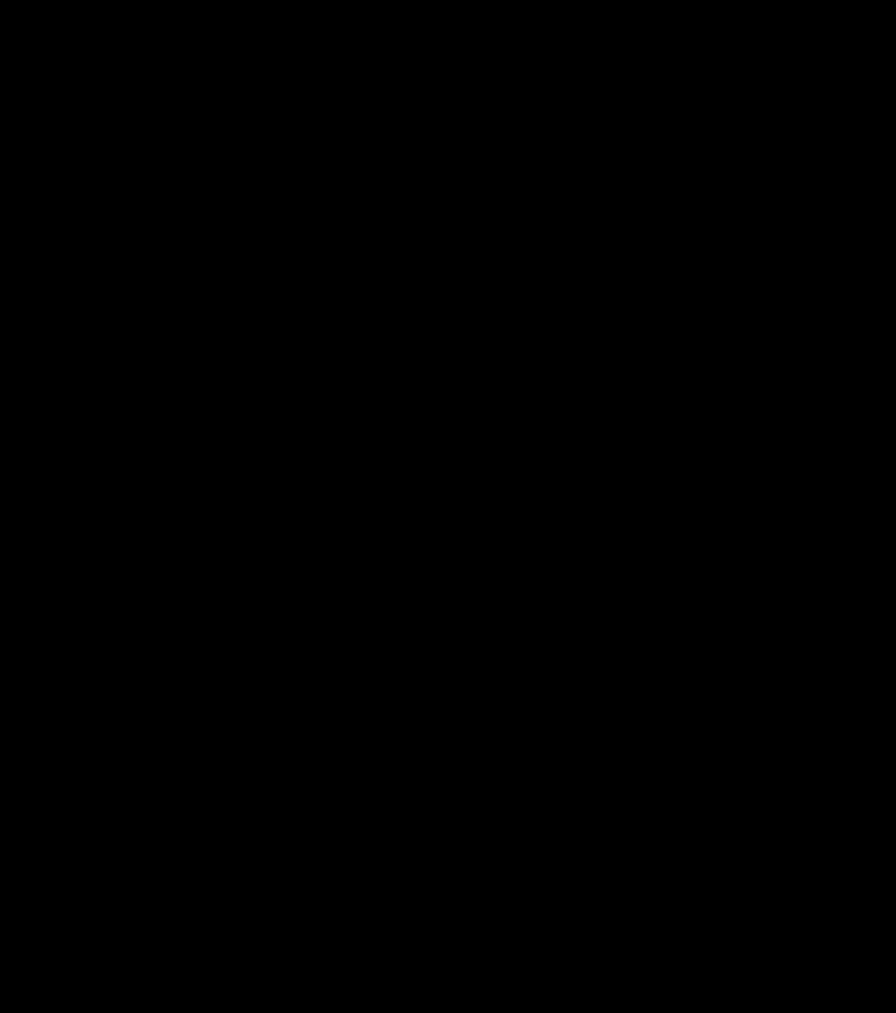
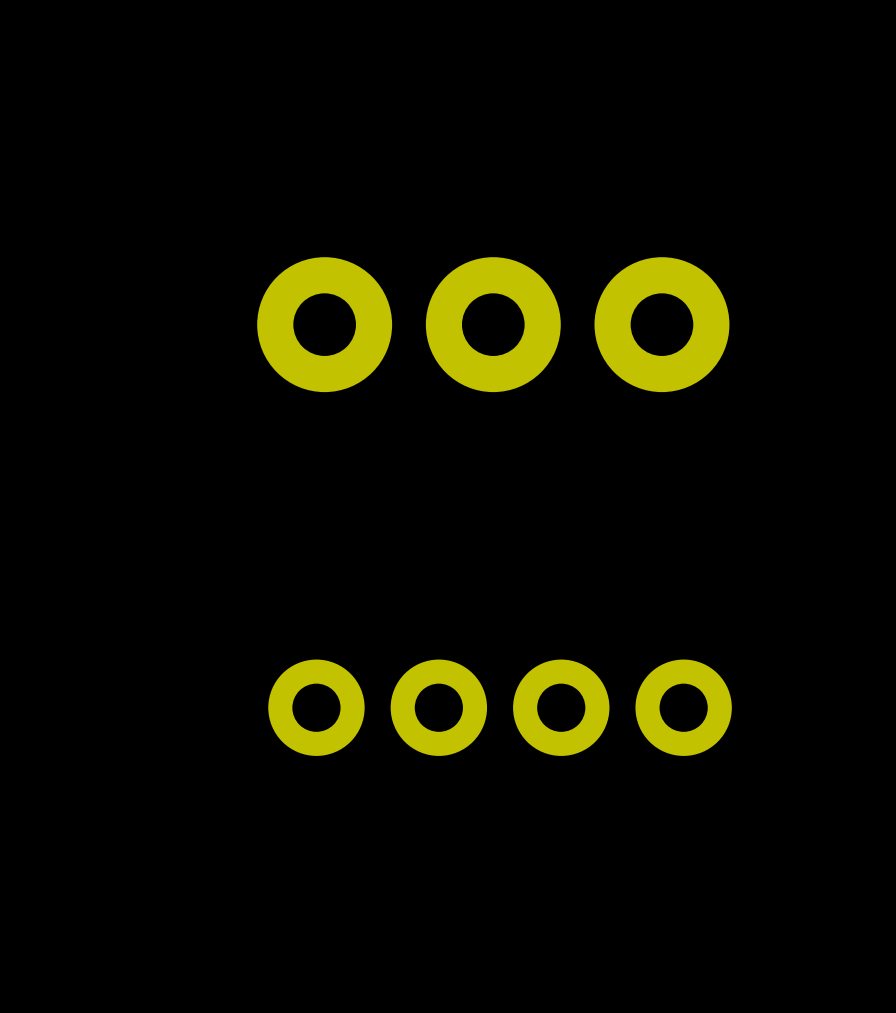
part: none -> (493, 324)
part: none -> (500, 707)

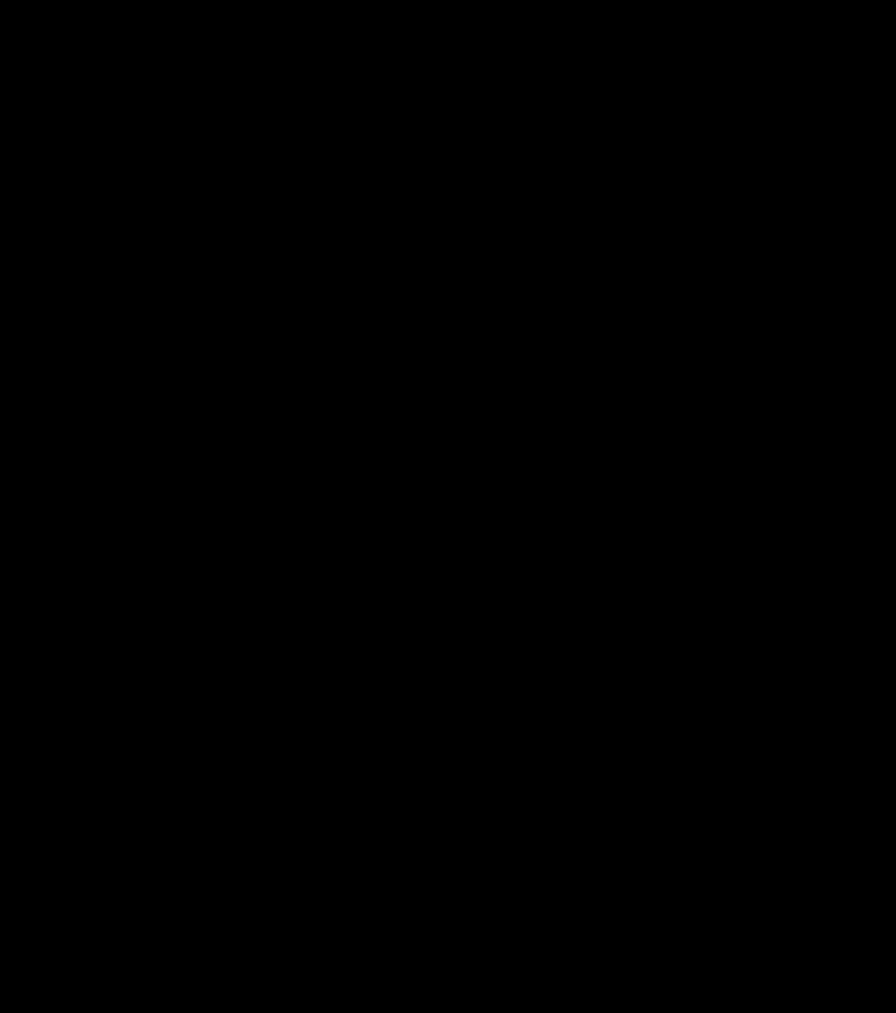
part: (493, 324) -> none
part: (500, 707) -> none

